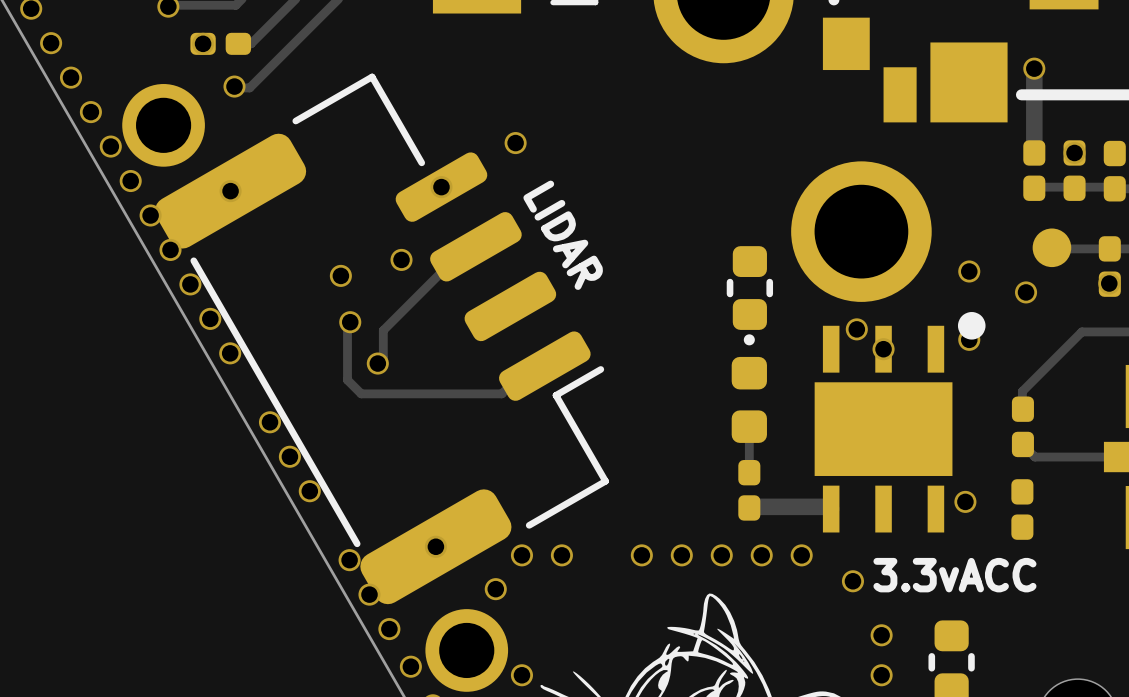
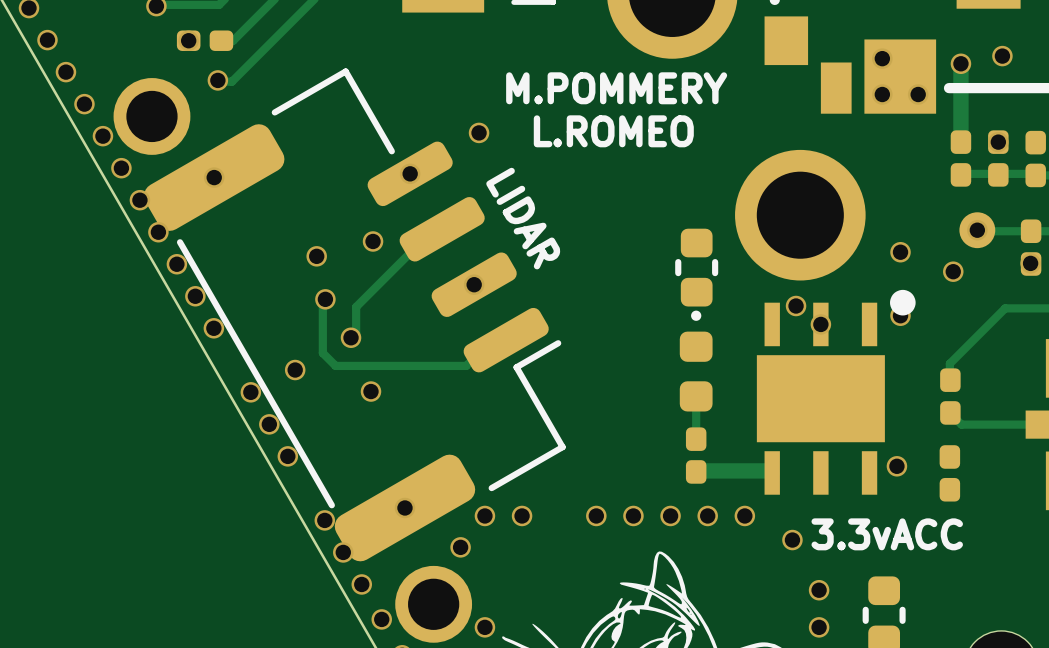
via: none -> (1002, 56)
via: none -> (882, 58)
text: none -> M.POMMERY (616, 88)
via: none -> (882, 94)
via: none -> (918, 94)
text: none -> L.ROMEO (613, 131)
via: none -> (977, 230)
via: none -> (474, 284)
via: none -> (295, 370)
via: none -> (370, 391)

